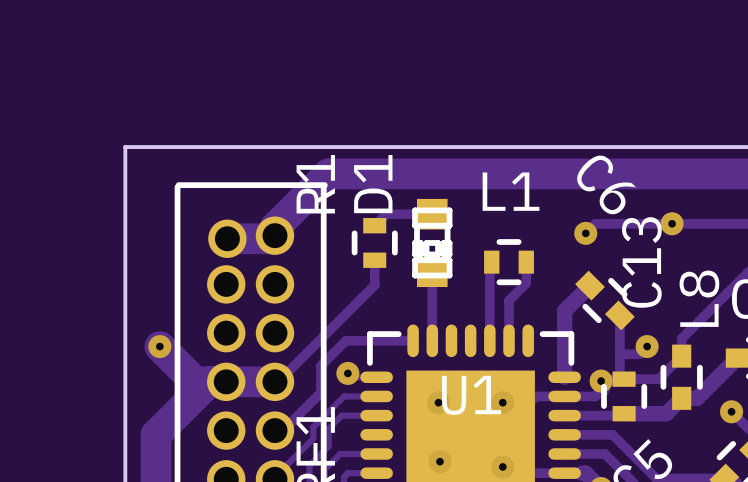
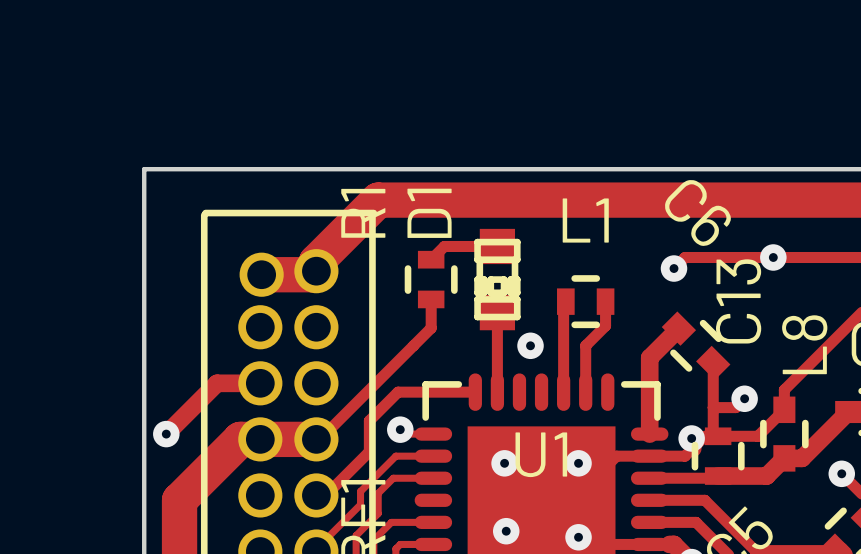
via: none -> (530, 345)
track: none -> (260, 383) (217, 383) (166, 434)
track: (159, 346) (195, 381) (208, 381) -> none
via position: (159, 346) -> (166, 434)

